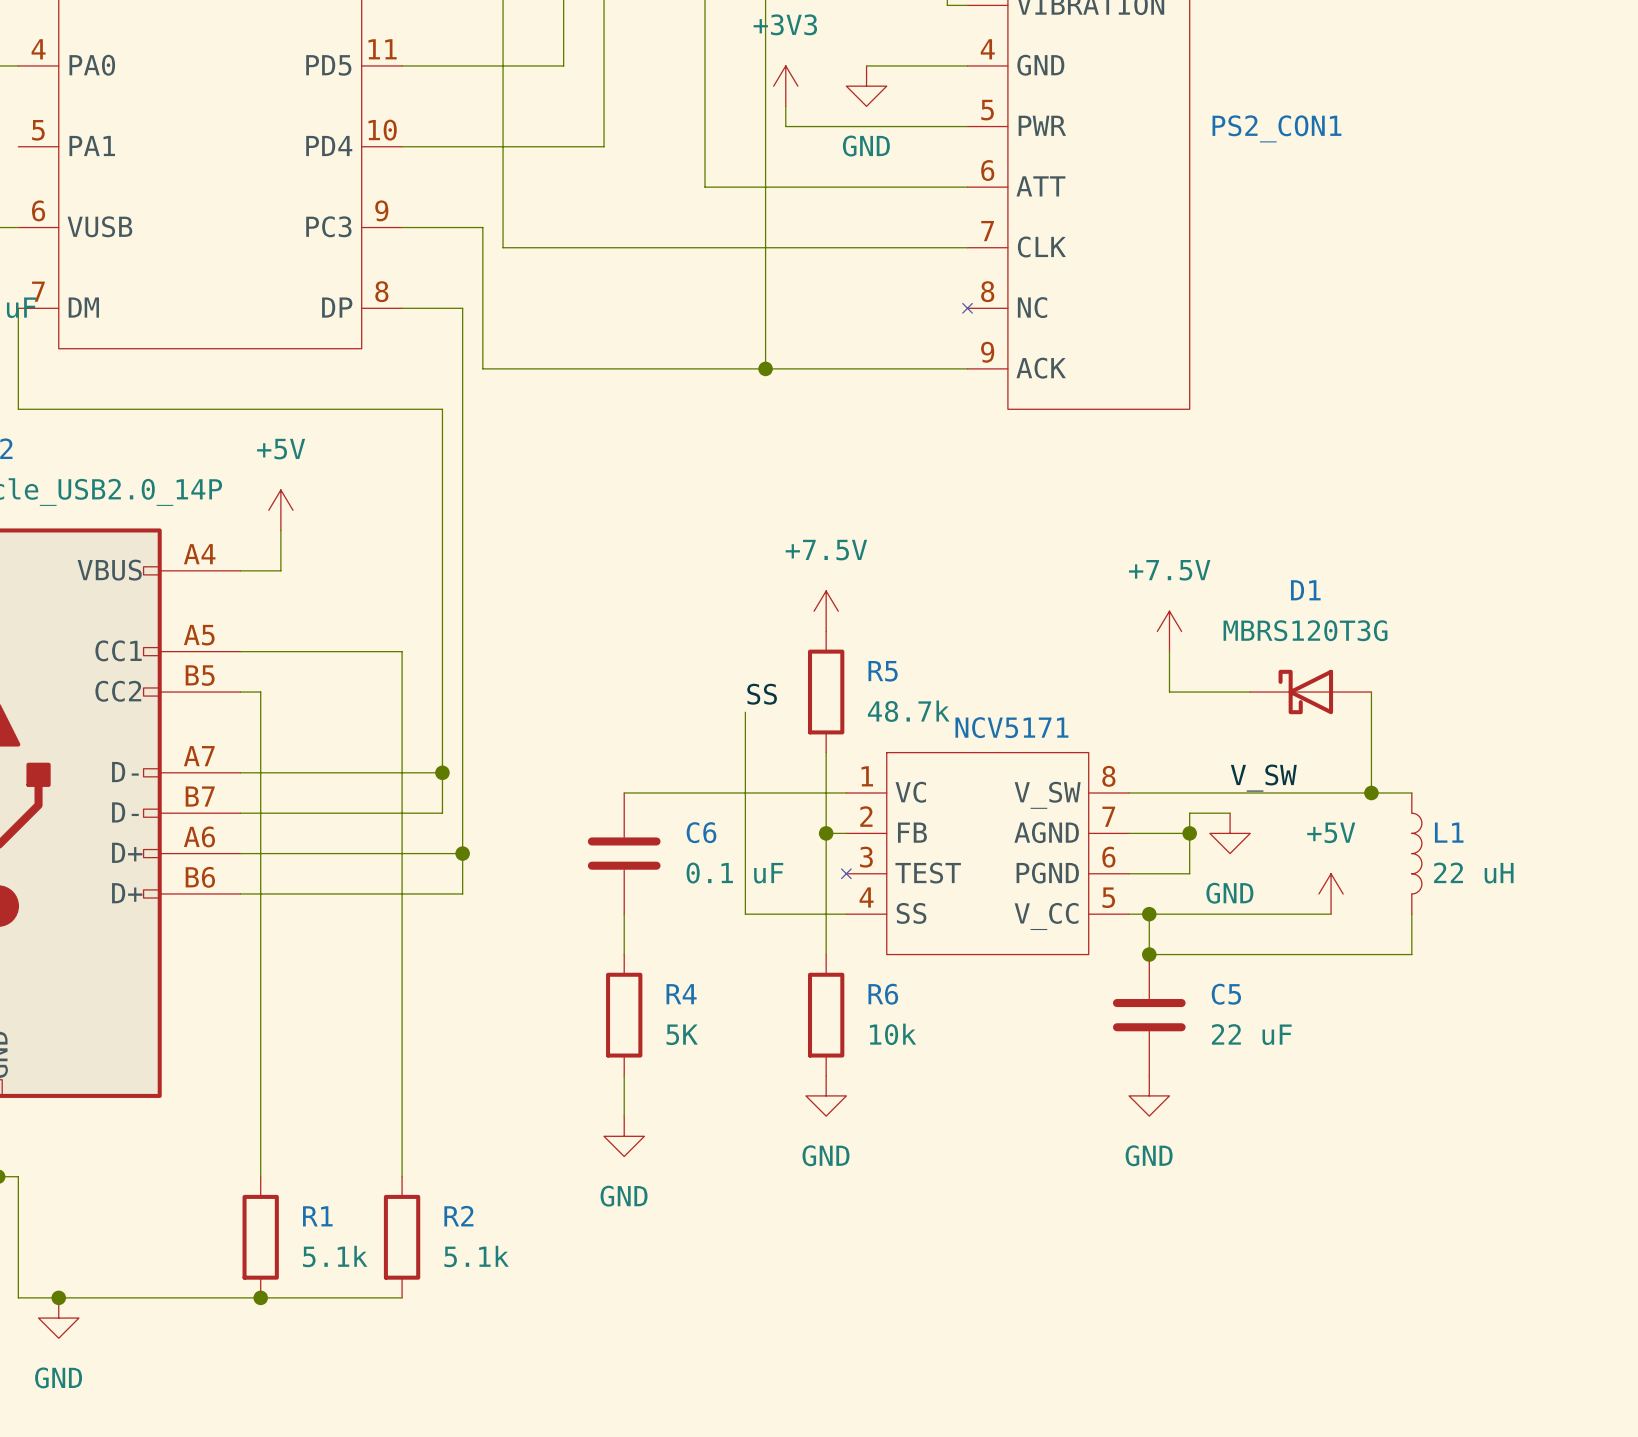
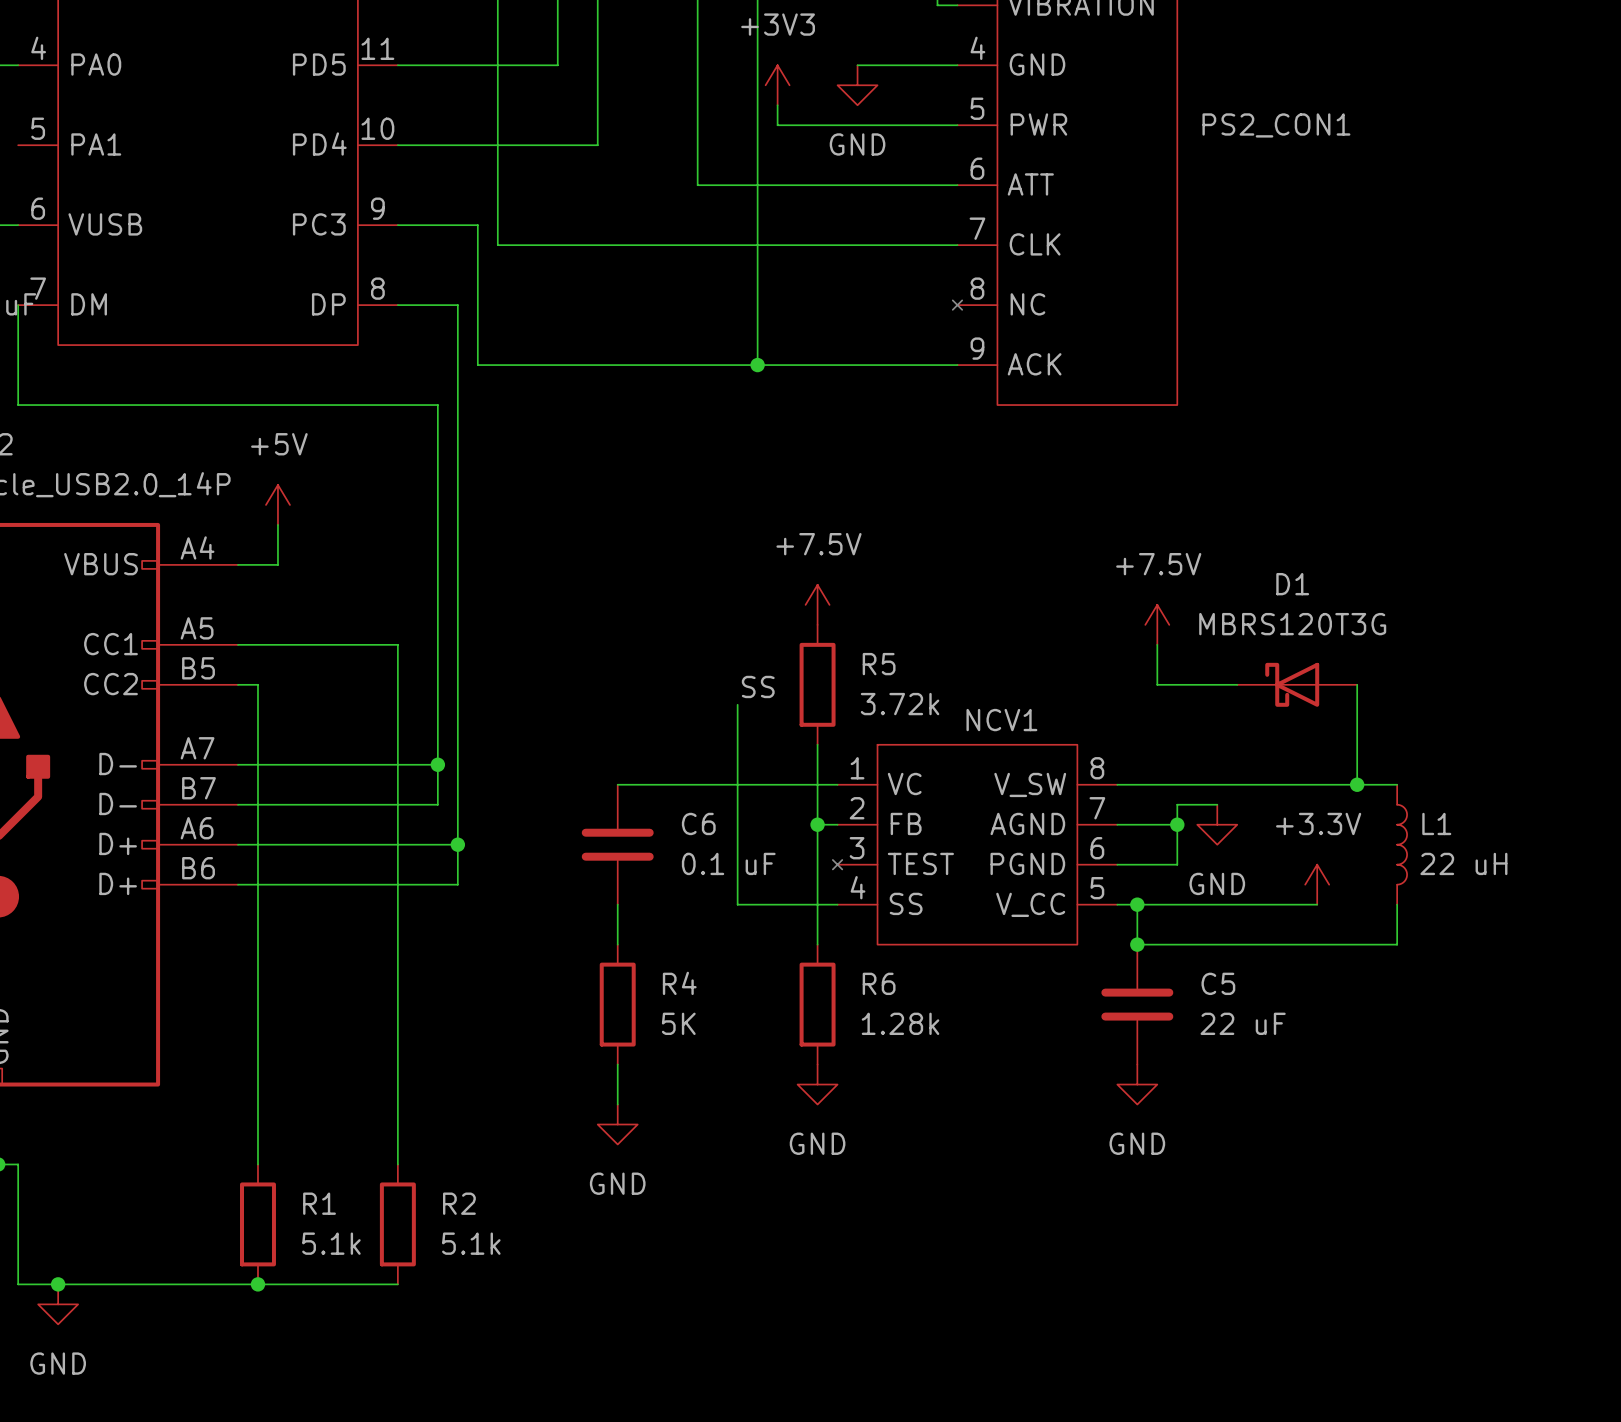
R5 value: 48.7k (908, 711) -> 3.72k (900, 704)
NCV5171 name: NCV5171 (1011, 727) -> NCV1 (1001, 720)
label: V_SW (1263, 778) -> none
power symbol: +5V (1331, 893) -> +3.3V (1317, 884)
R6 value: 10k (893, 1034) -> 1.28k (900, 1023)

